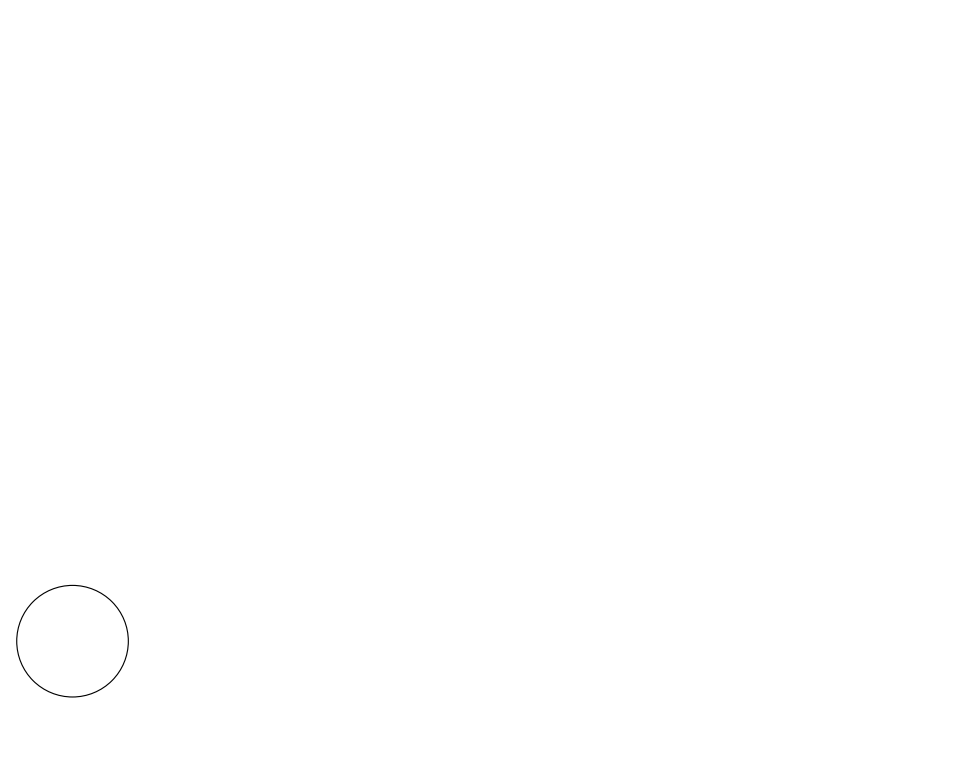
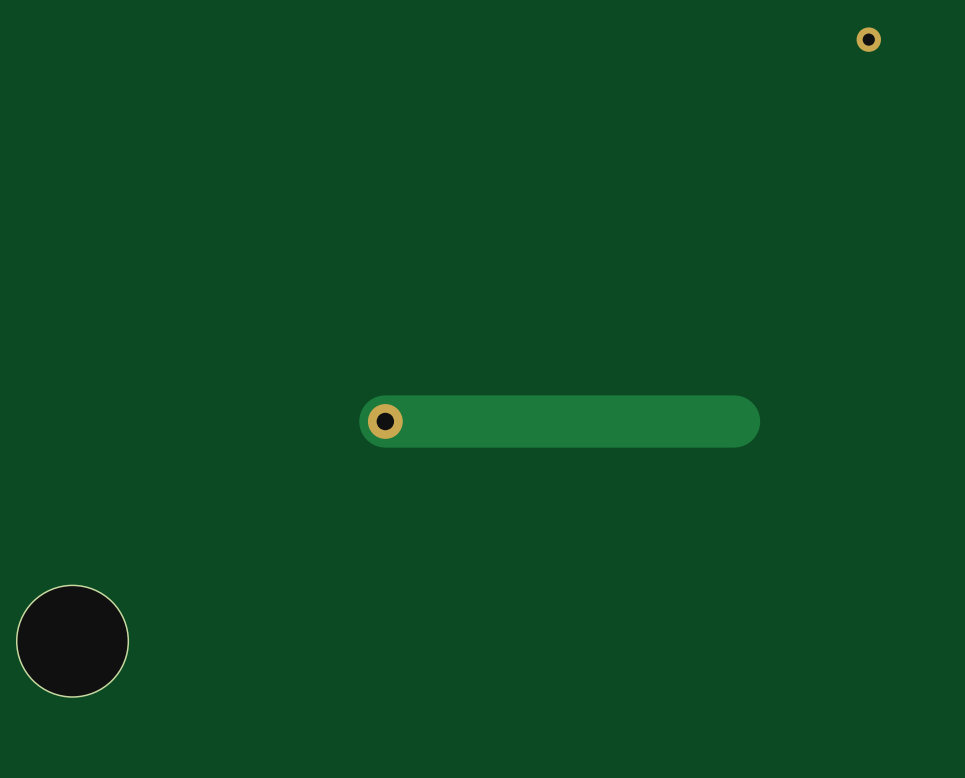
via: none -> (868, 39)
via: none -> (385, 421)
track: none -> (734, 421) (385, 421)

